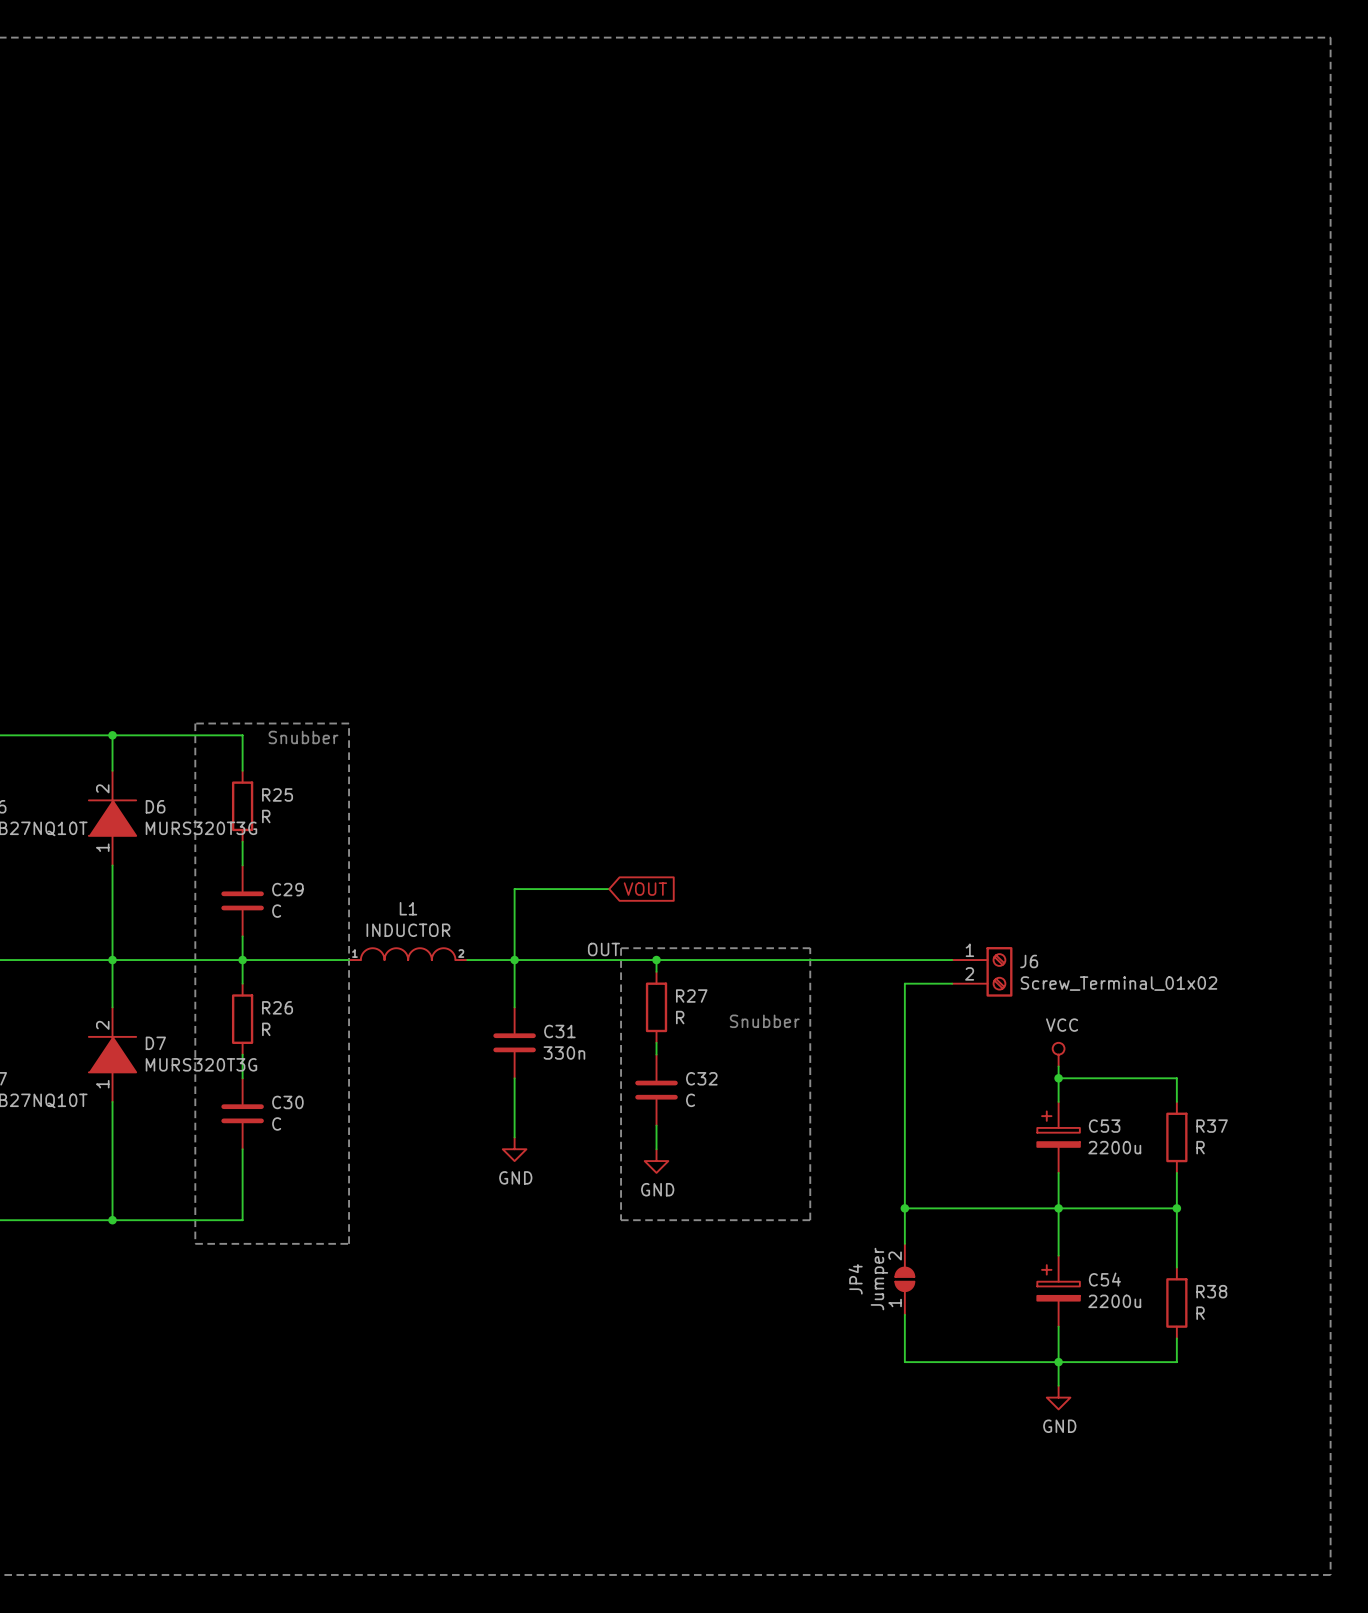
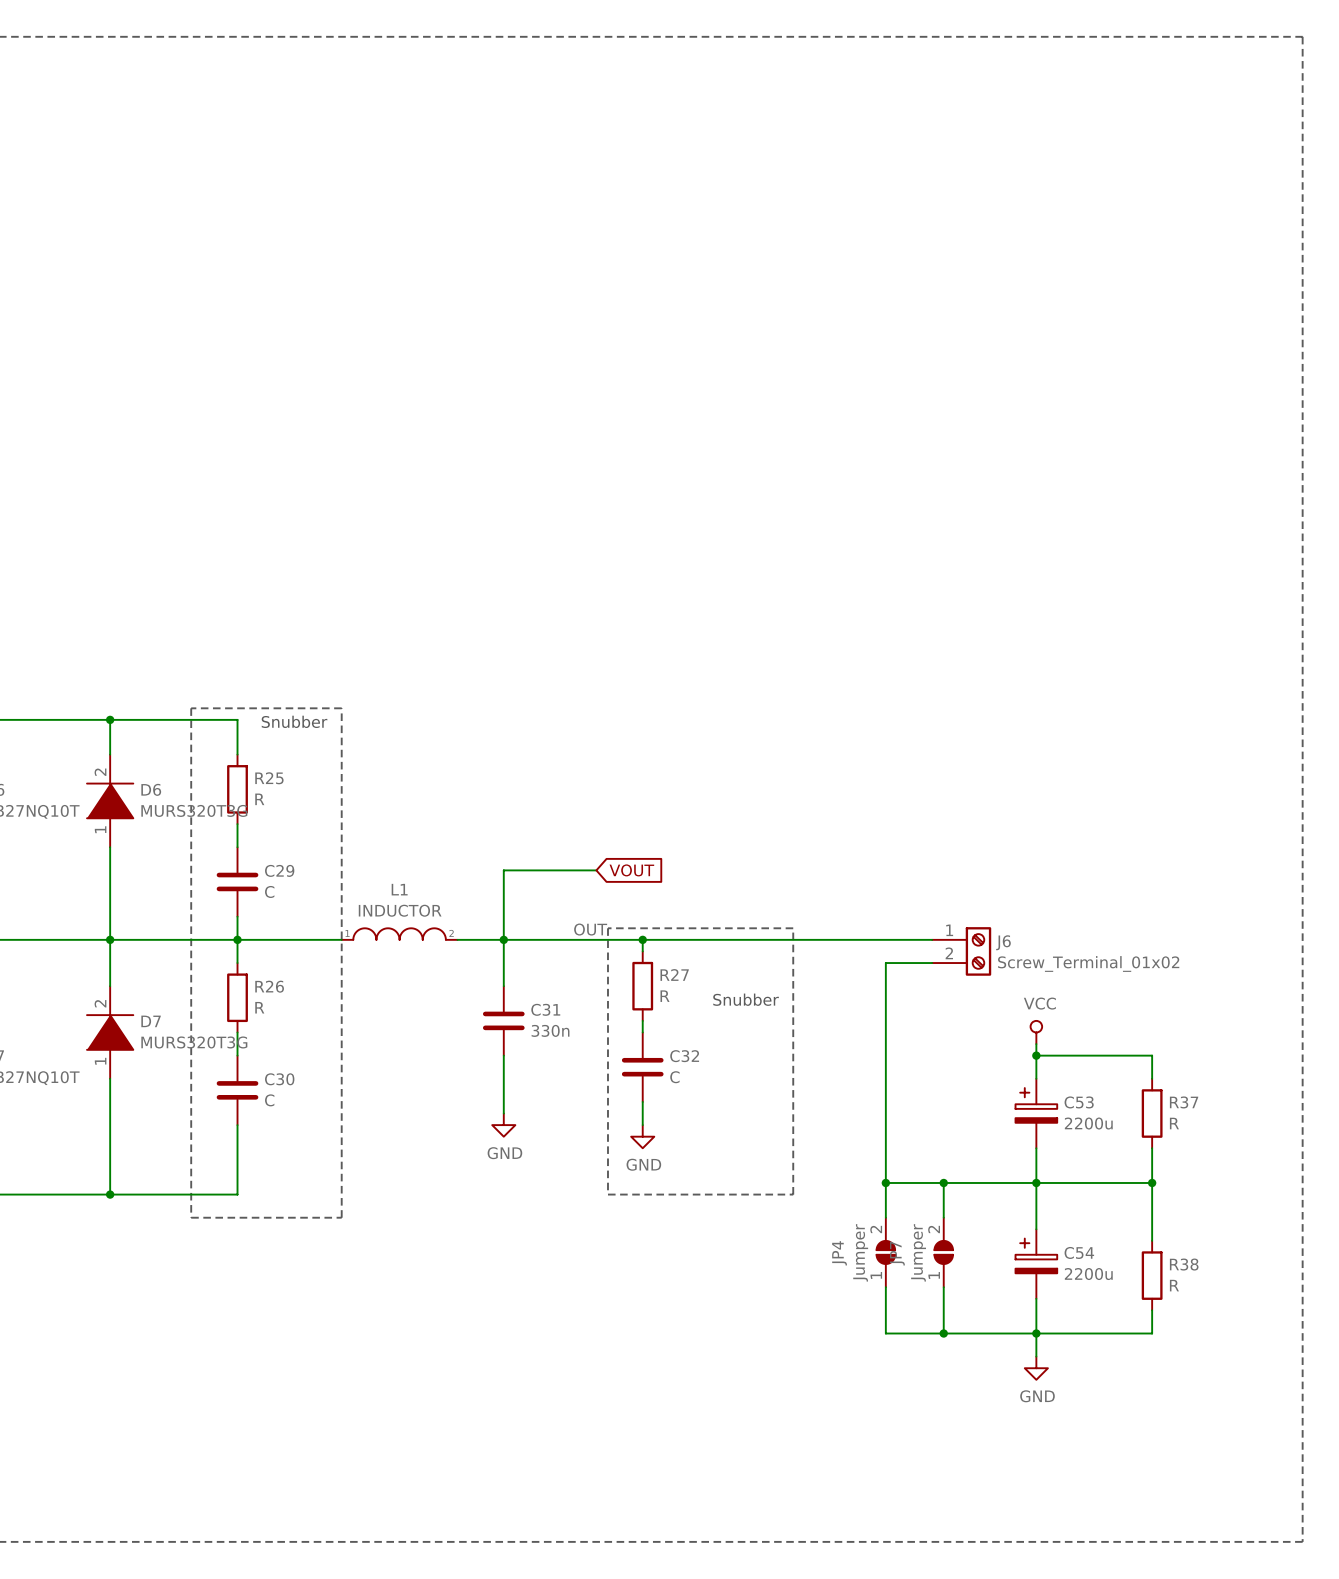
wire: none -> (943, 1182) (943, 1217)
junction: none -> (943, 1182)
JP7: none -> Jumper (943, 1252)
wire: none -> (943, 1287) (943, 1333)
junction: none -> (943, 1333)

